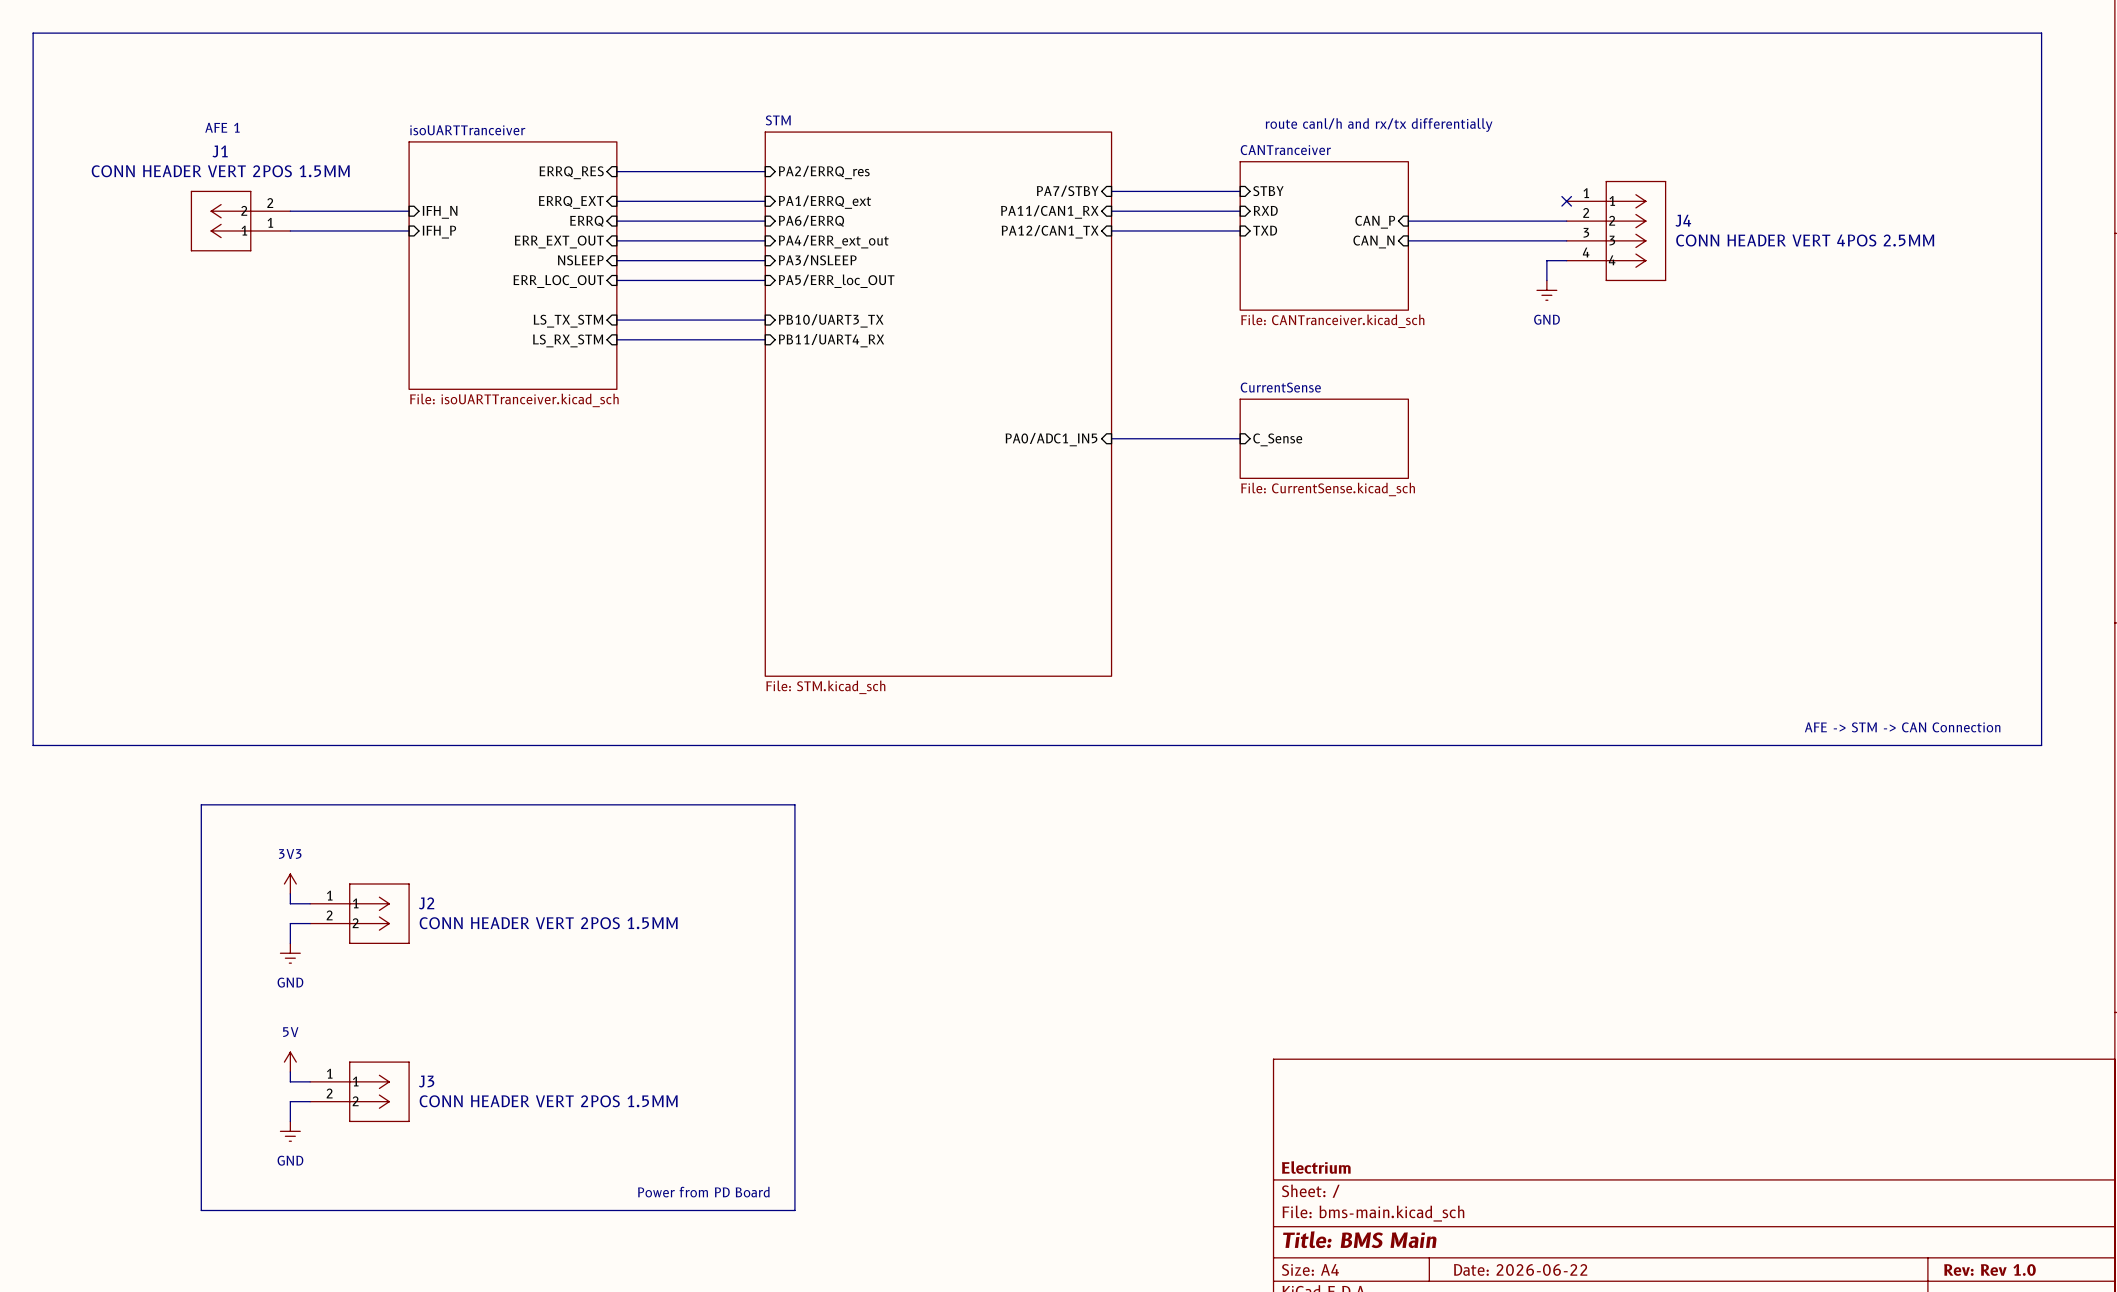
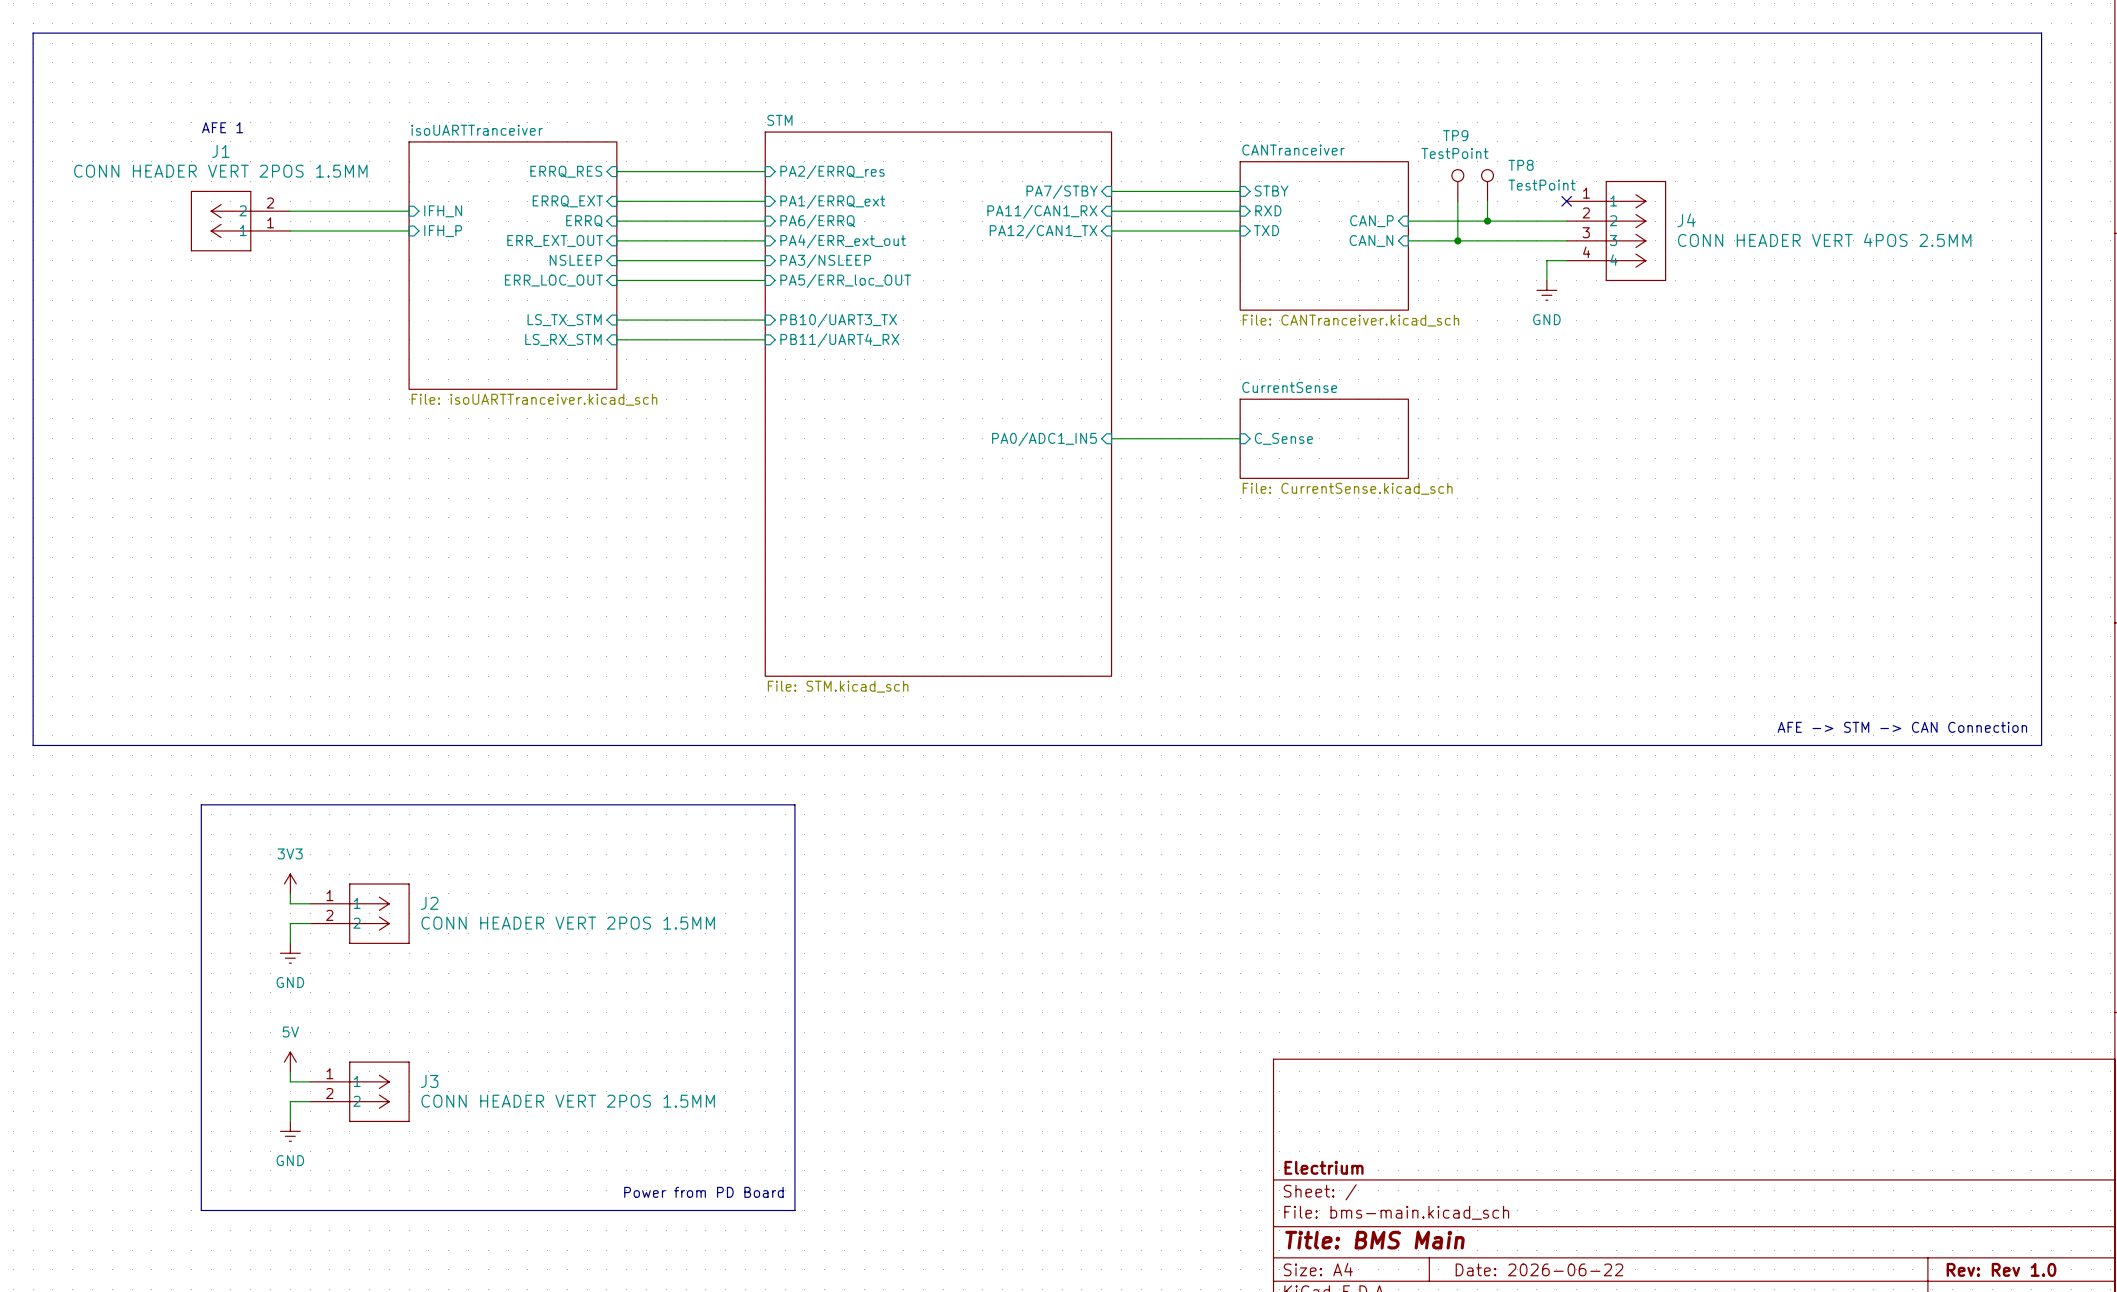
text: route canl/h and rx/tx differentially (1379, 125) -> none
TP9: none -> TestPoint (1457, 185)
TP8: none -> TestPoint (1487, 185)
wire: none -> (1457, 201) (1457, 240)
wire: none -> (1487, 201) (1487, 221)
junction: none -> (1487, 221)
junction: none -> (1457, 240)

